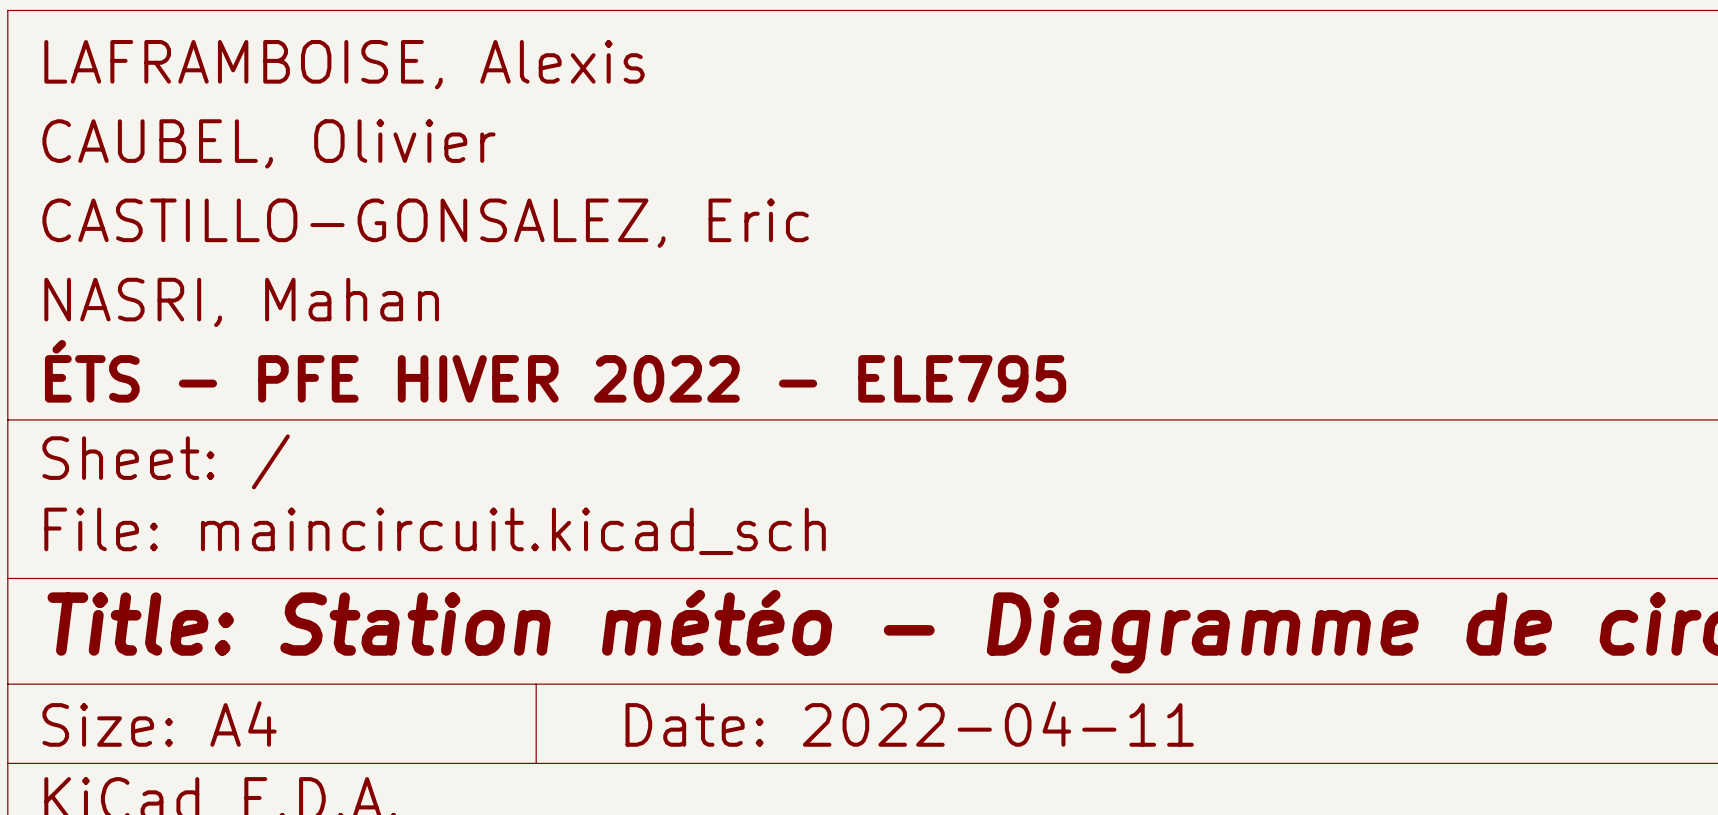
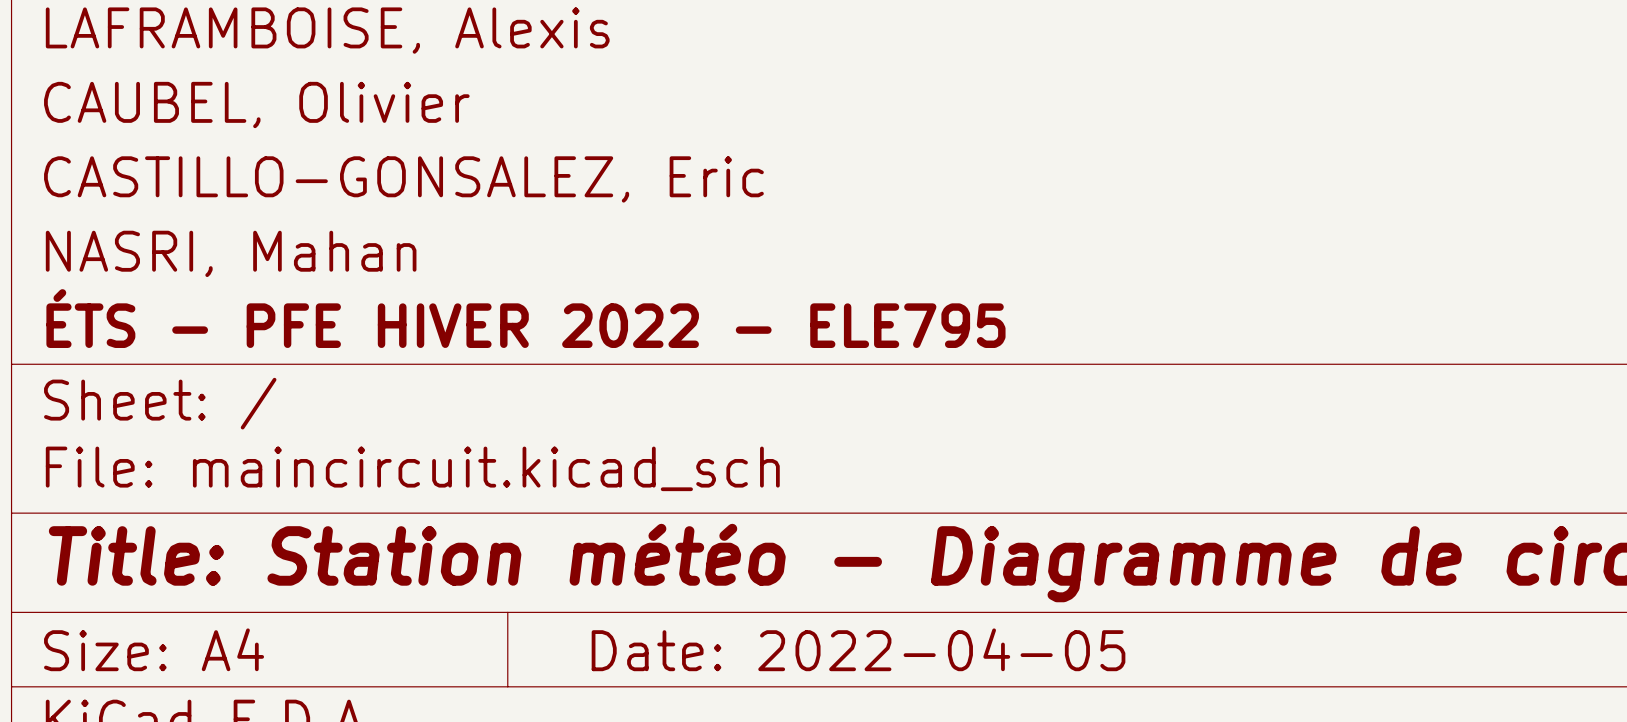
title block: Date: 2022-04-11 (909, 723) -> Date: 2022-04-05 (858, 649)

